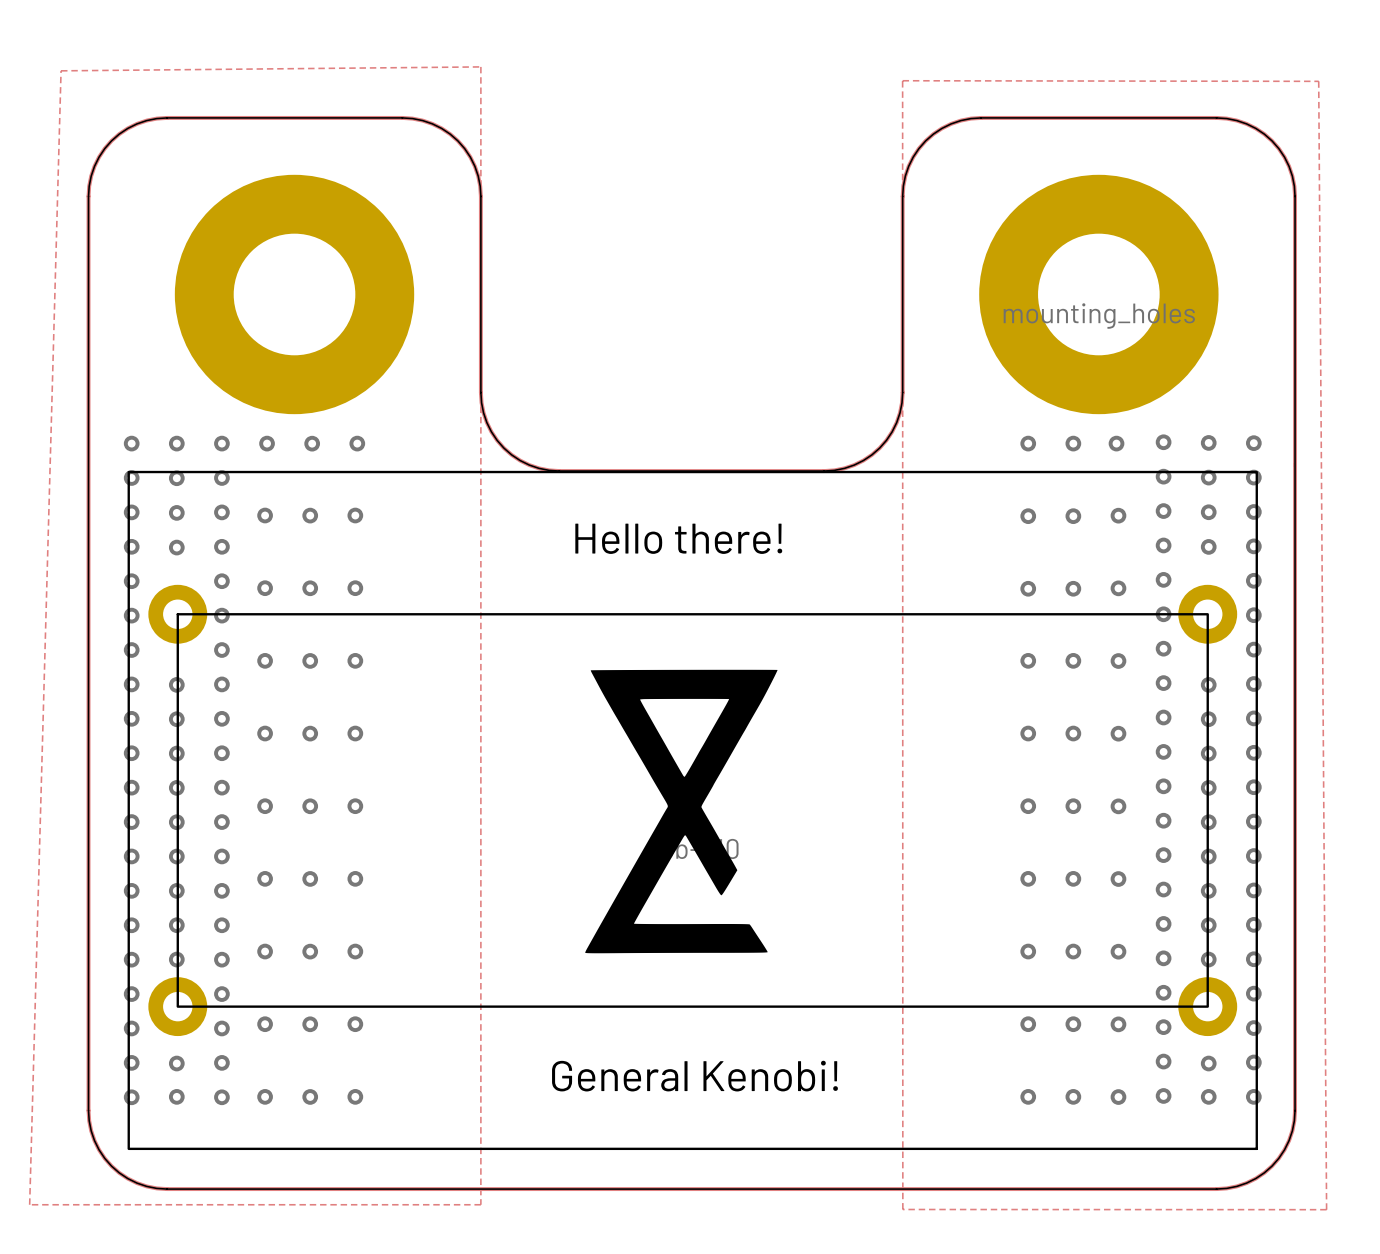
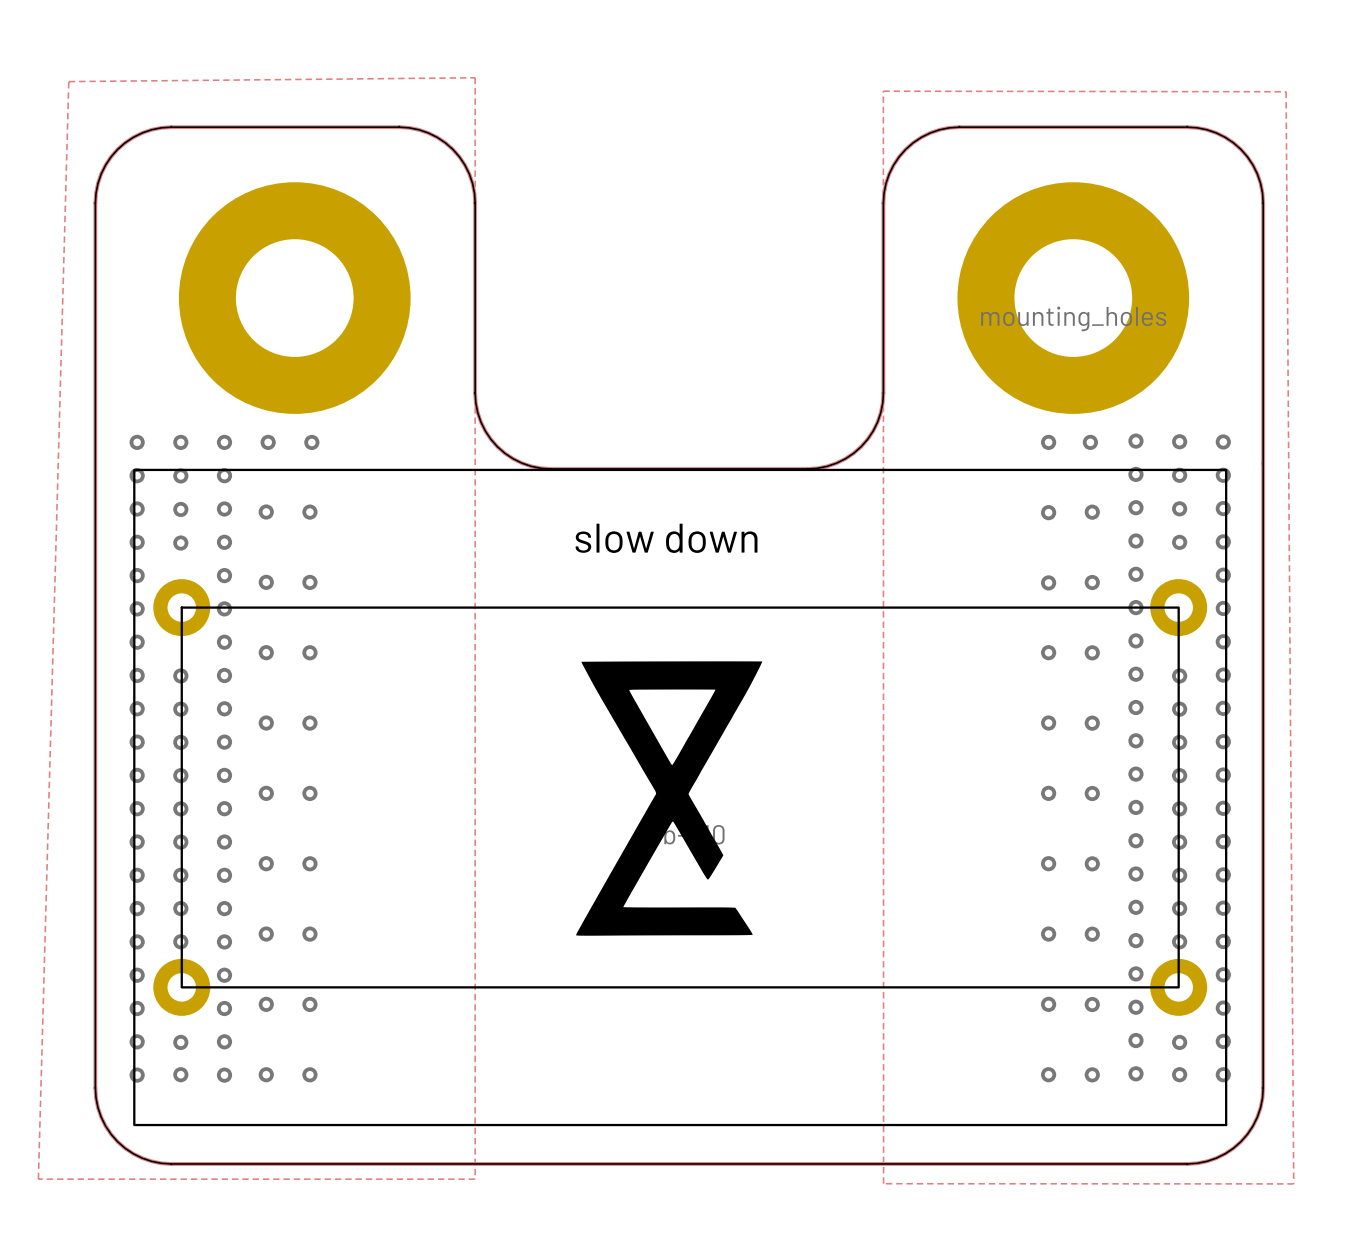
via: (357, 443) -> none
via: (1028, 443) -> none
via: (355, 515) -> none
via: (1028, 516) -> none
Hello there! name: Hello there! (678, 538) -> slow down (666, 538)
via: (355, 588) -> none
via: (1028, 588) -> none
via: (355, 660) -> none
via: (1028, 660) -> none
via: (355, 733) -> none
via: (1028, 733) -> none
via: (355, 806) -> none
via: (1028, 806) -> none
via: (355, 878) -> none
via: (1028, 878) -> none
via: (355, 951) -> none
via: (1028, 951) -> none
via: (355, 1024) -> none
via: (1028, 1024) -> none
Hello there! value: General Kenobi! (694, 1076) -> none
via: (355, 1096) -> none
via: (1028, 1096) -> none

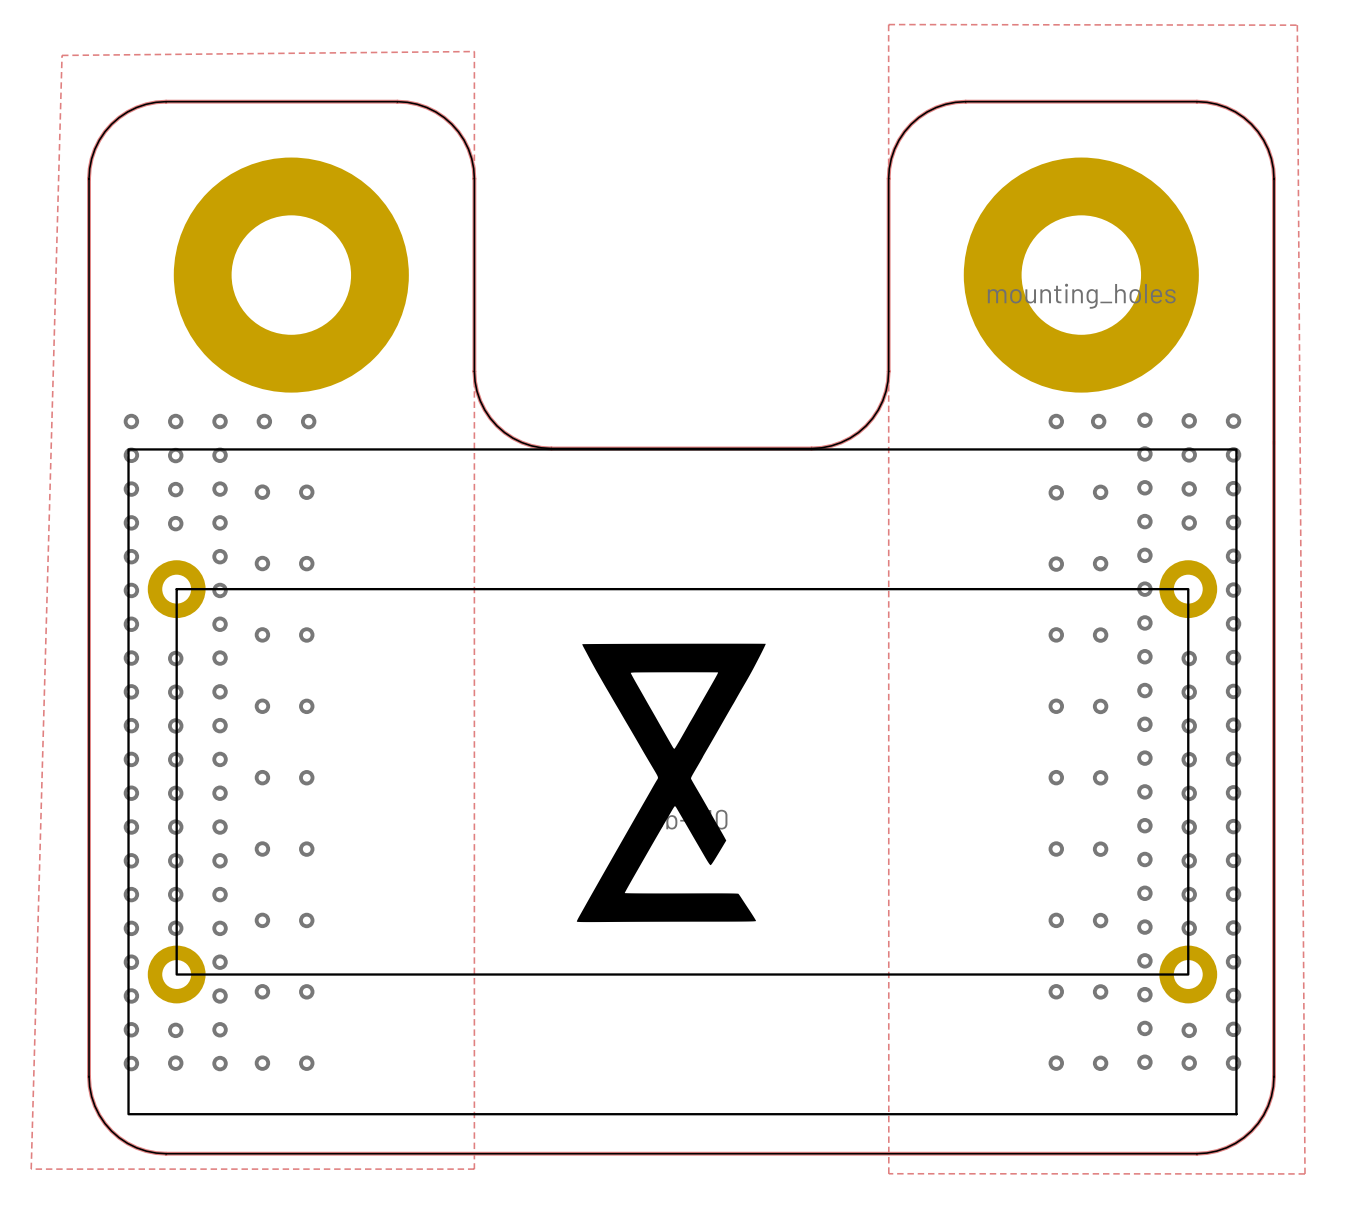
slow down: (669, 798) -> none
zone outline: (883, 1183) (883, 91) (1286, 91) (1293, 1183) -> (888, 1173) (888, 24) (1297, 25) (1305, 1173)

